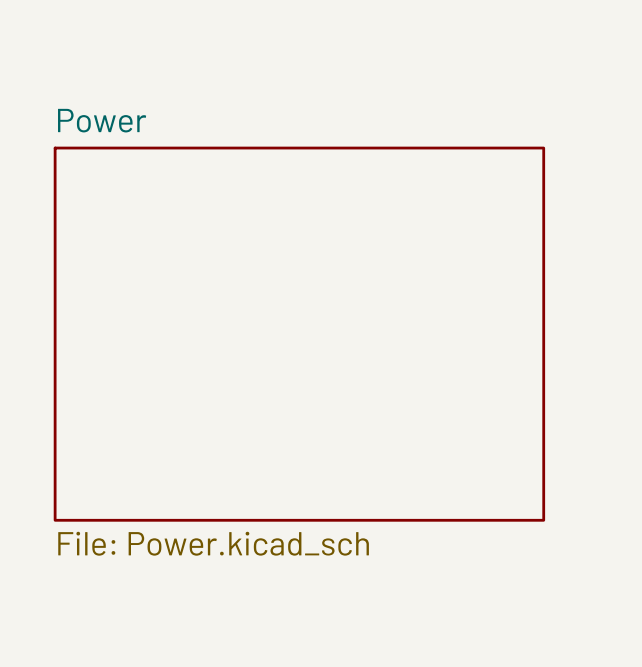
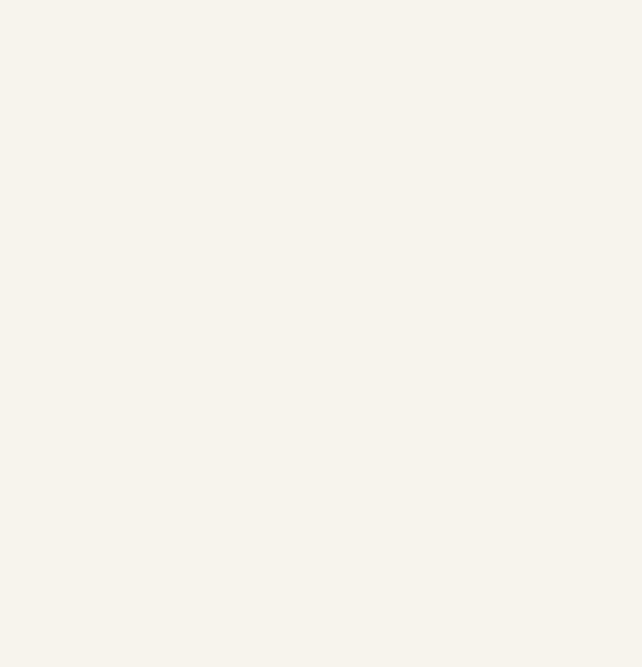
sheet Power: File: Power.kicad_sch (299, 334) -> none

